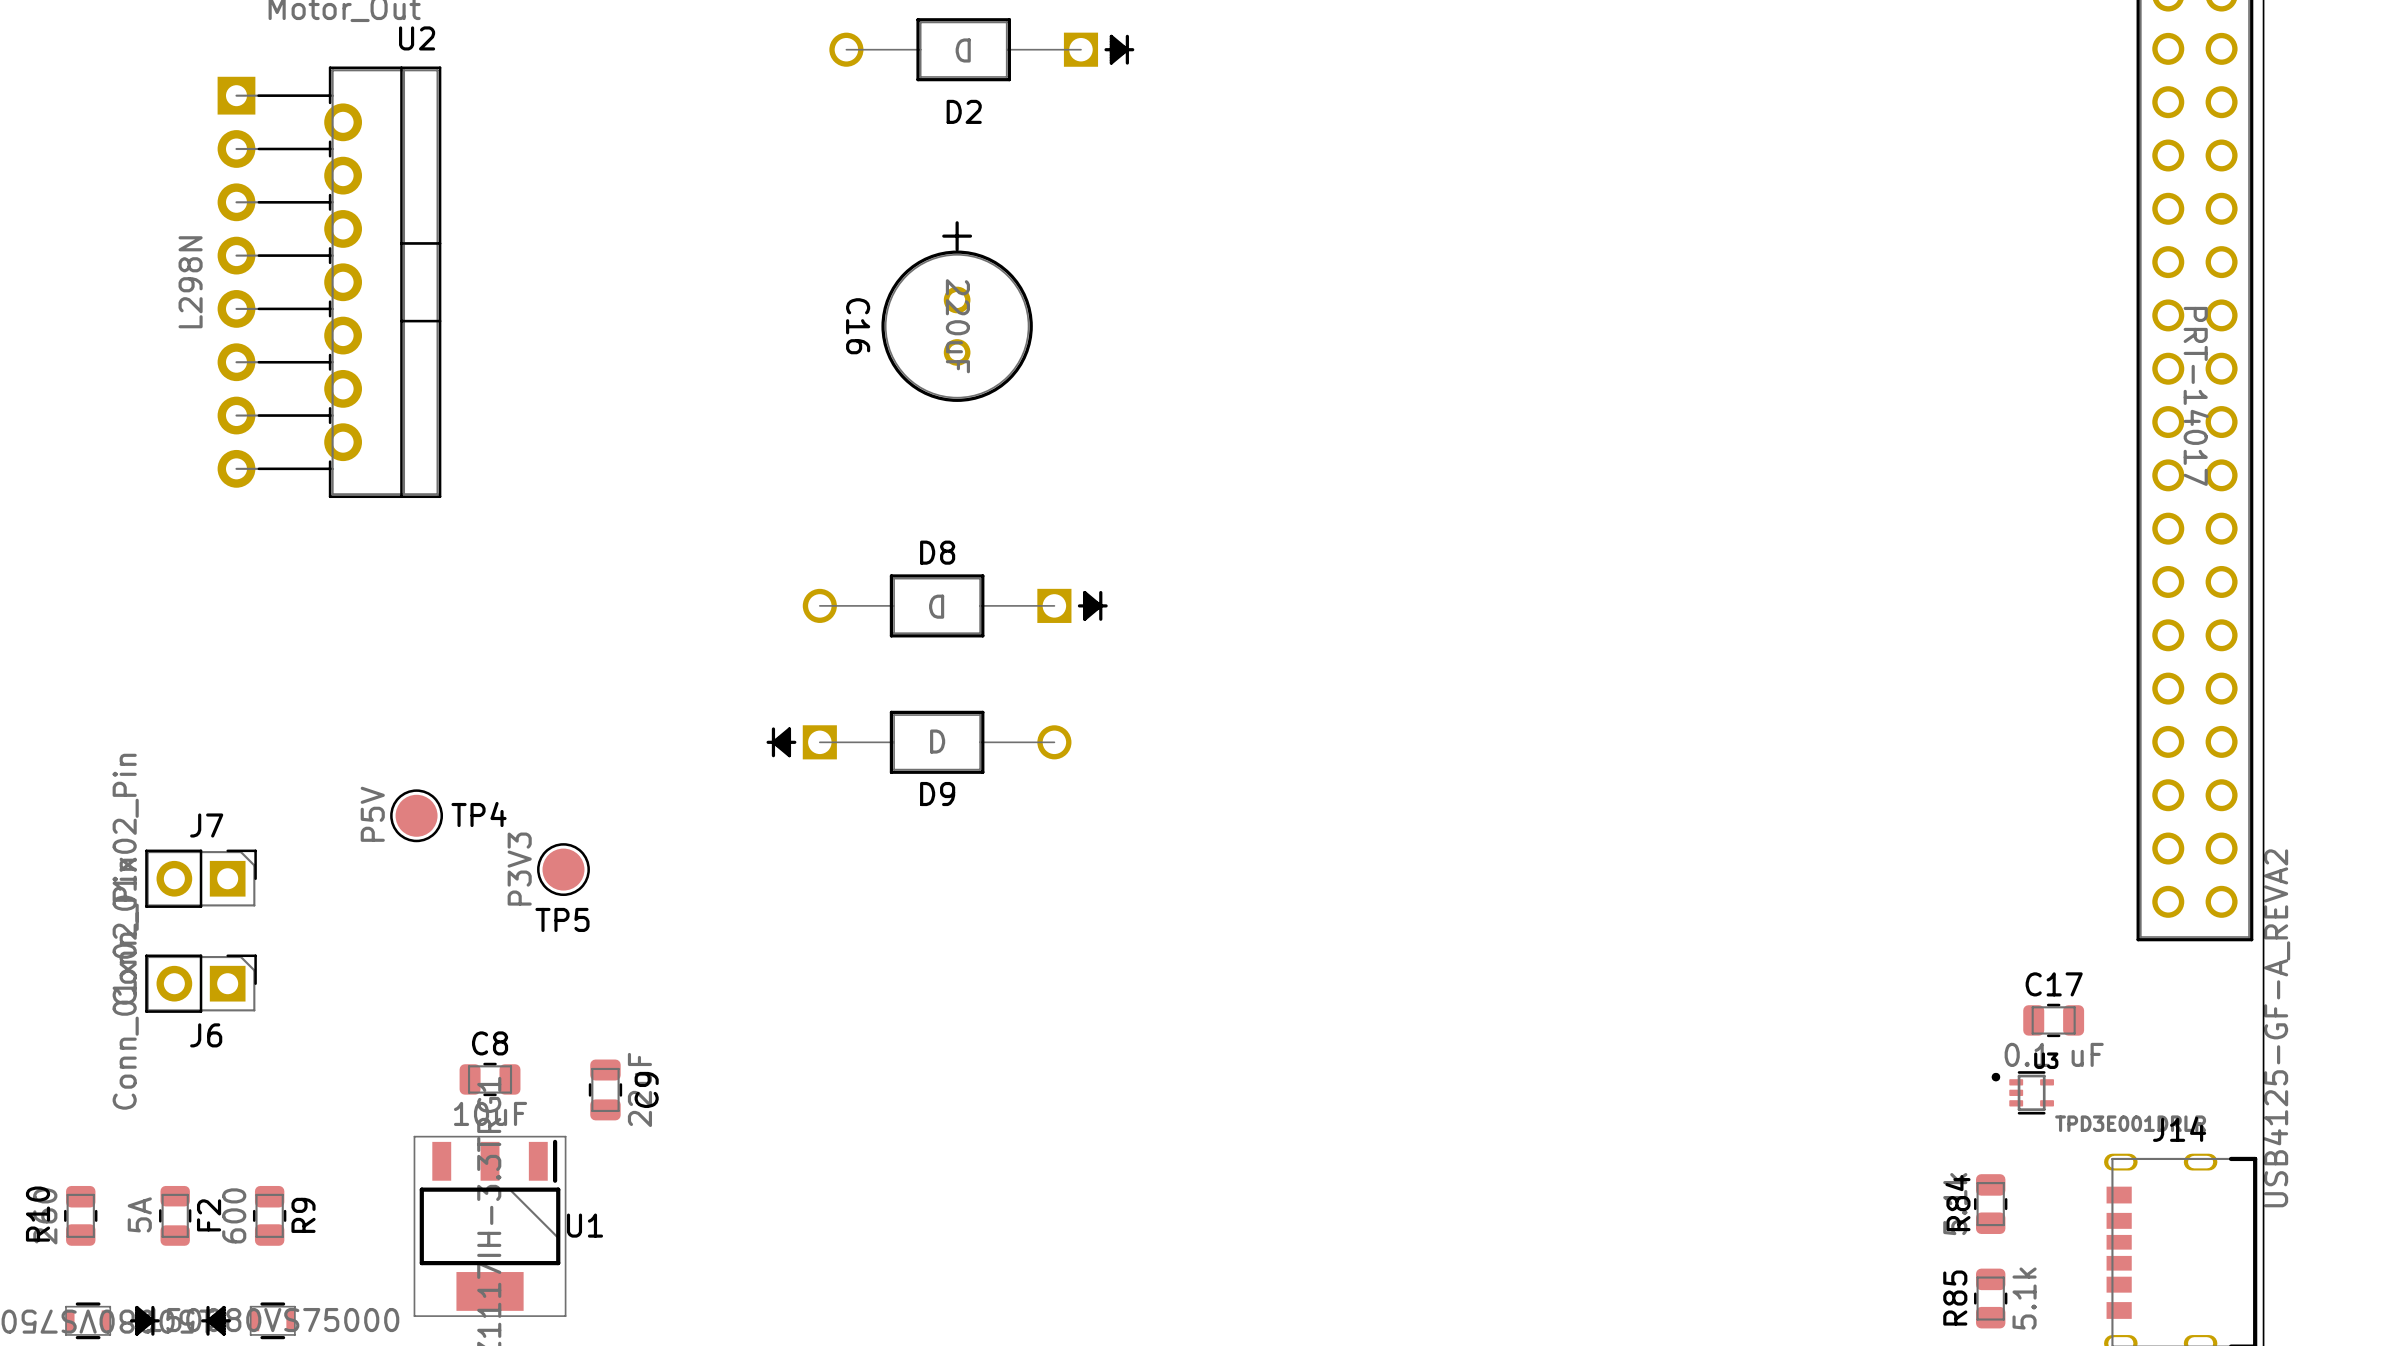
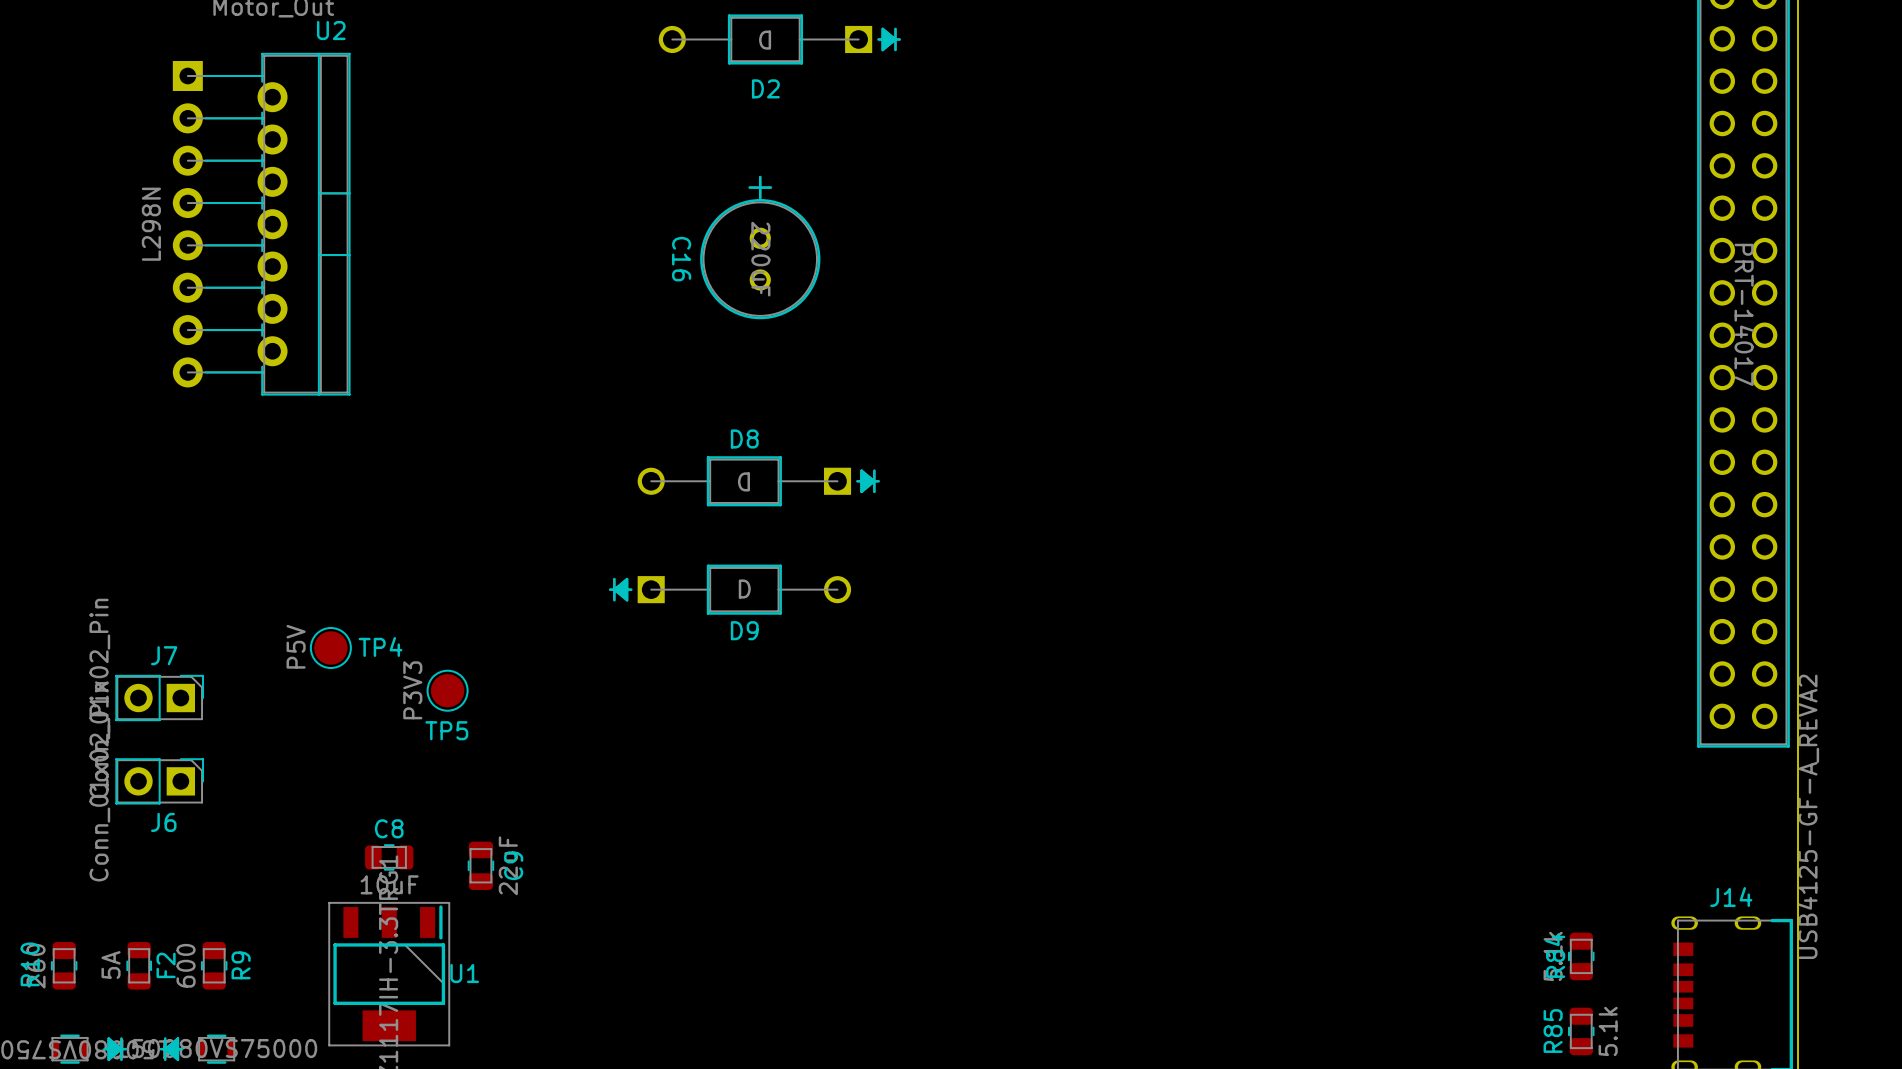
C17: 0.1 uF (2053, 1020) -> none
U3: TPD3E001DRLR (2022, 1092) -> none

